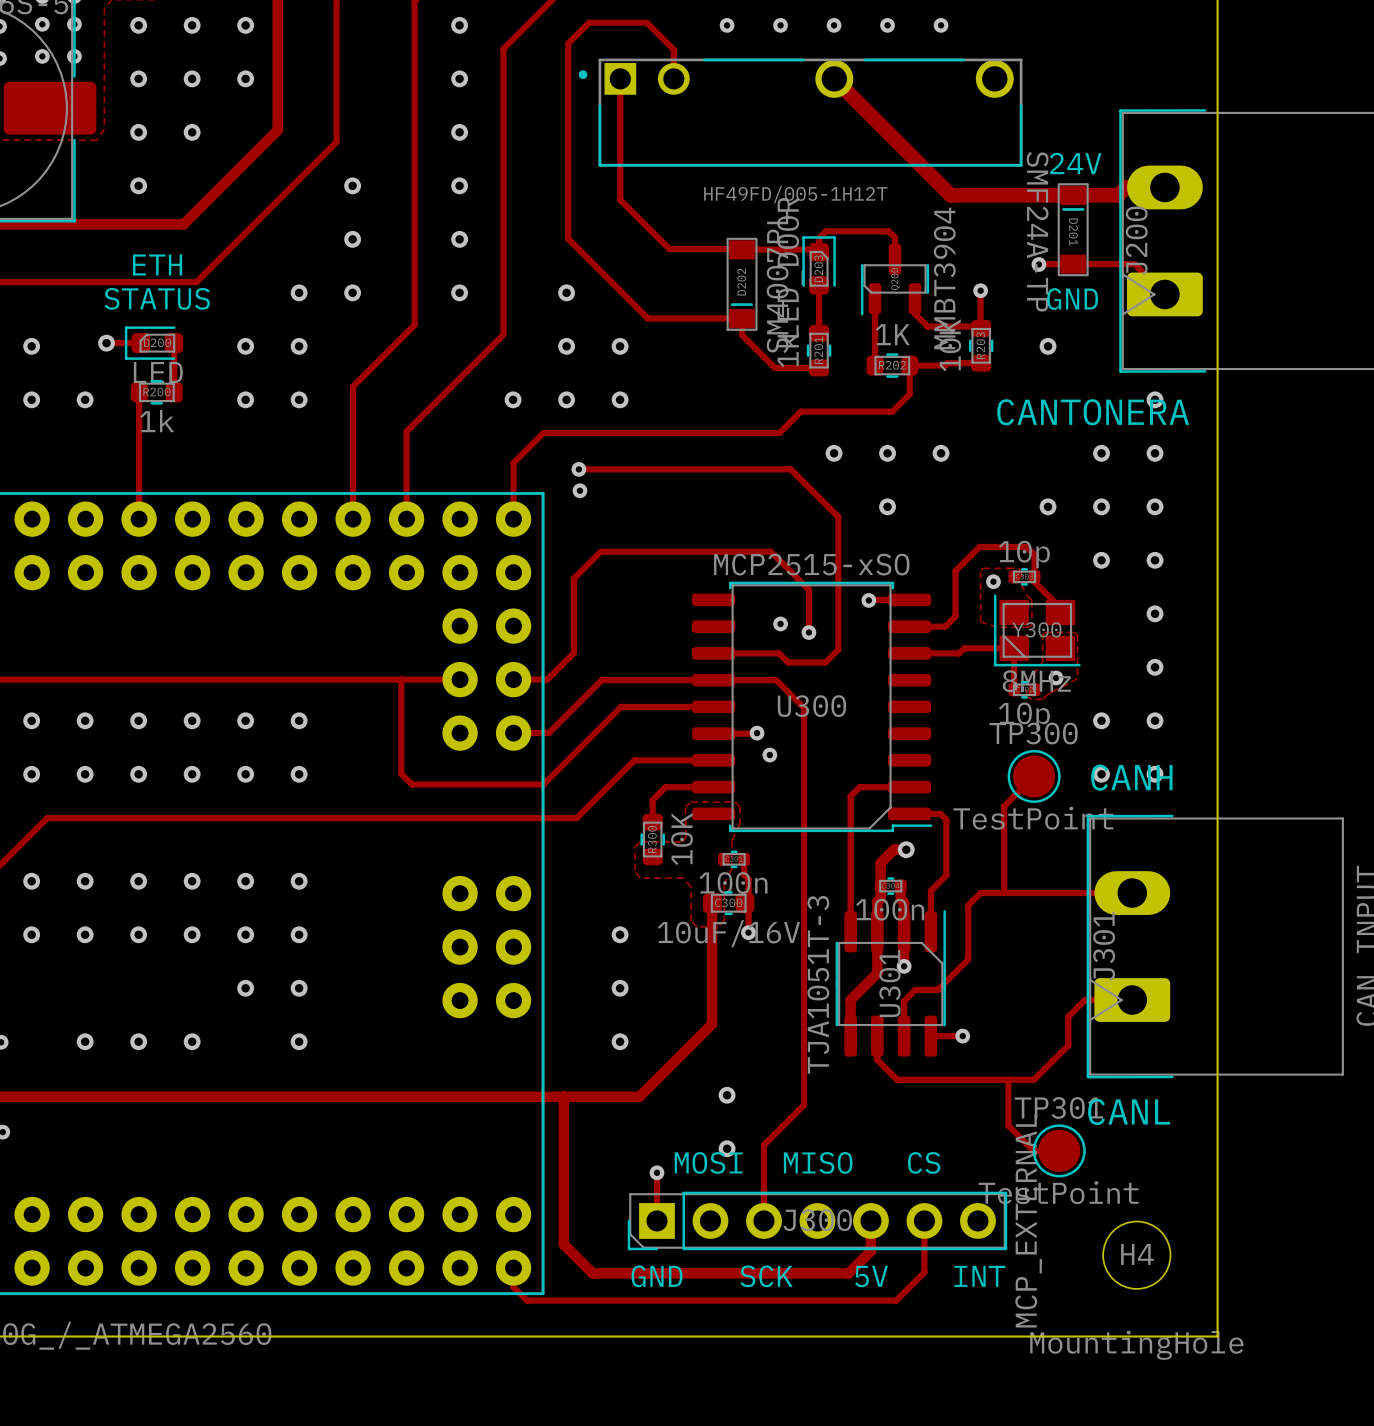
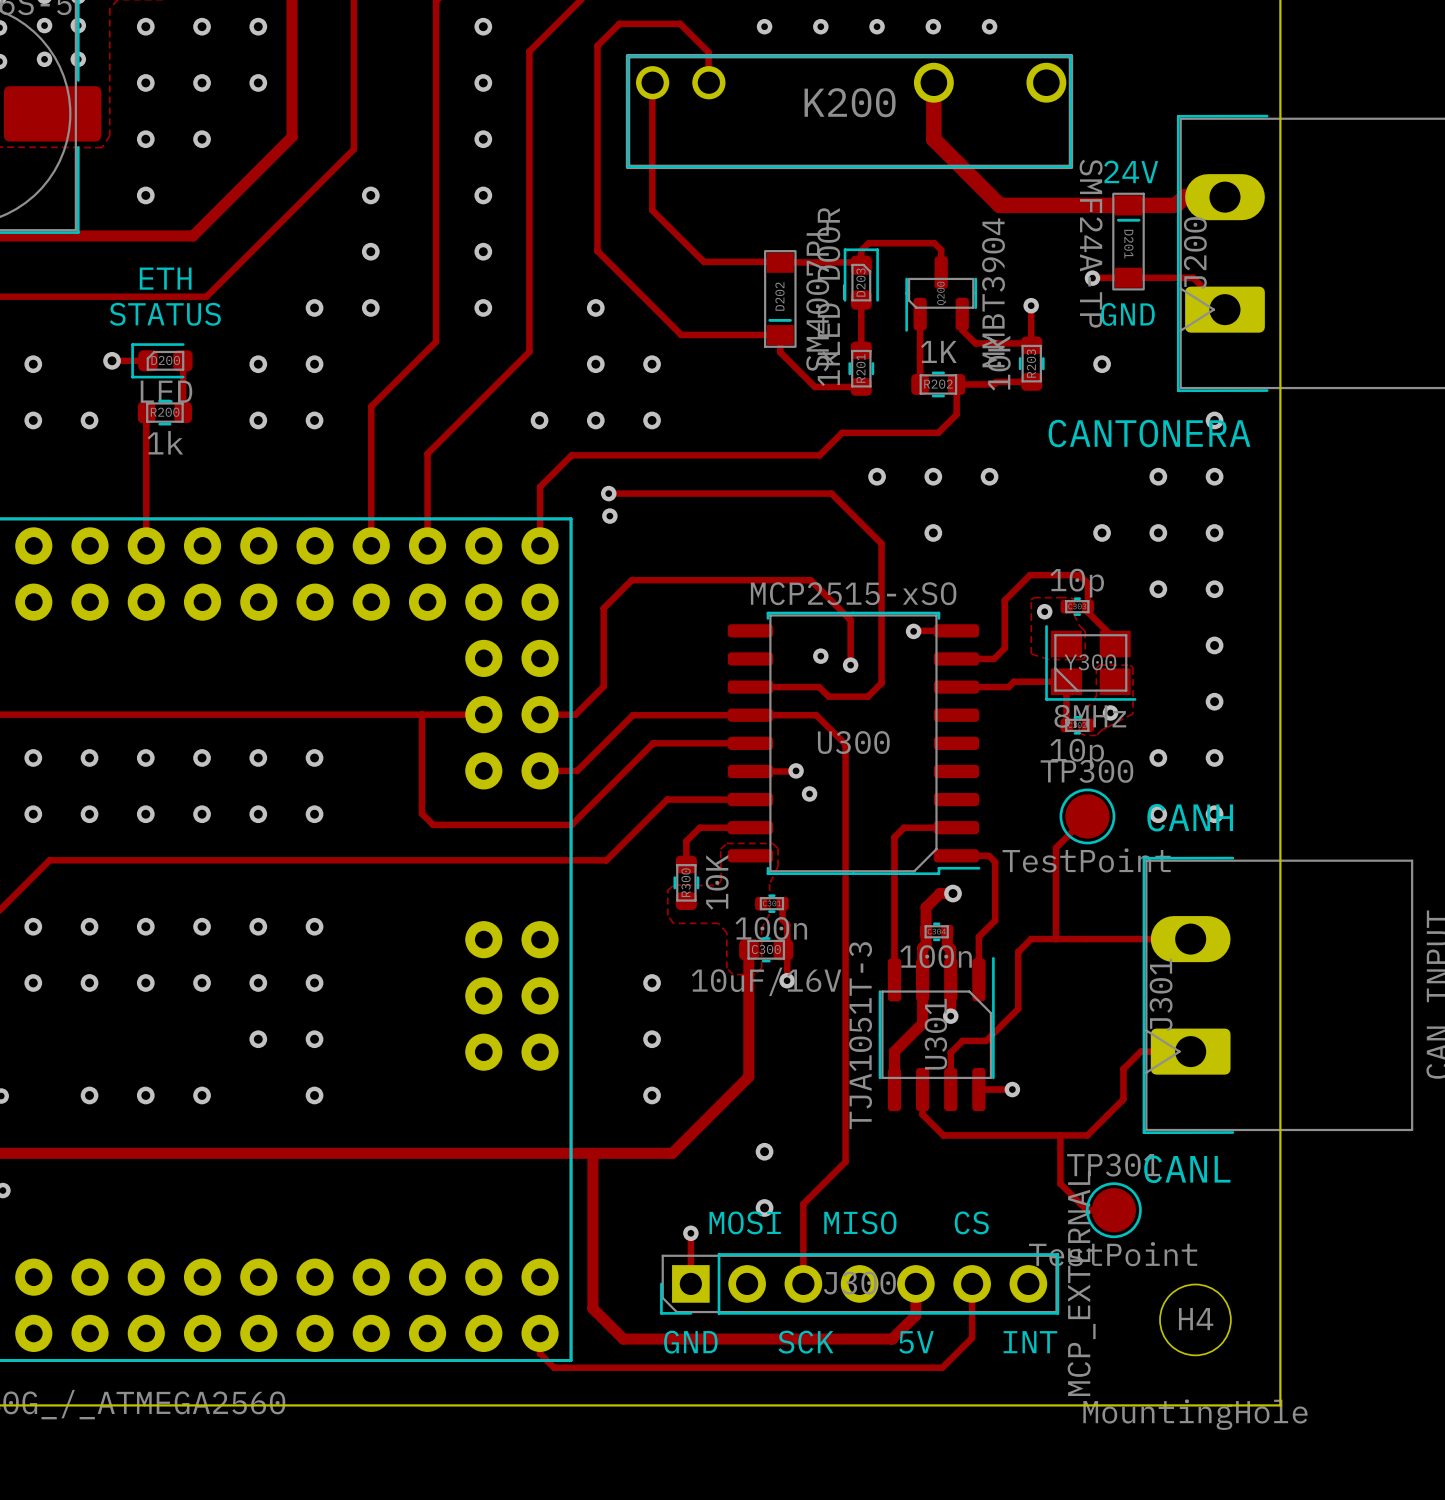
track: (834, 78) (888, 132) -> (933, 82) (933, 139)
K200: none -> (849, 111)
part: HF49FD/005-1H12T (800, 112) -> none

